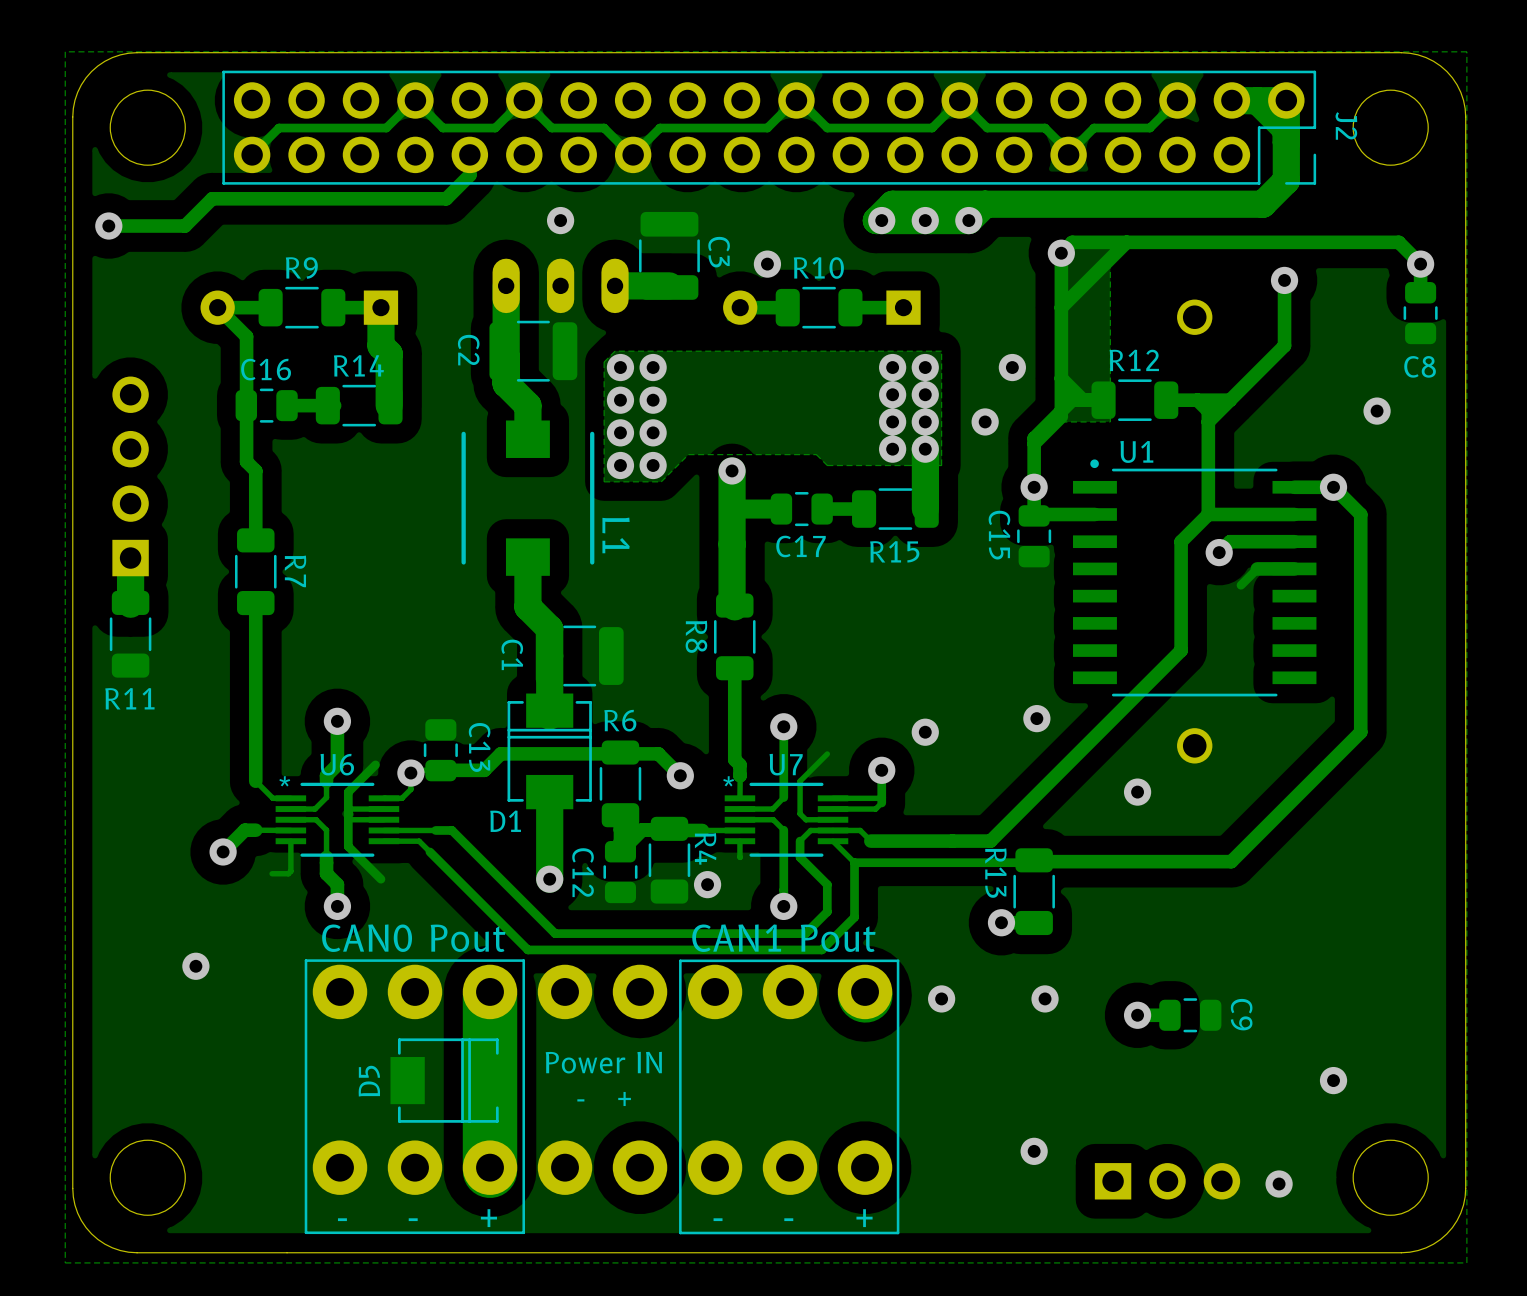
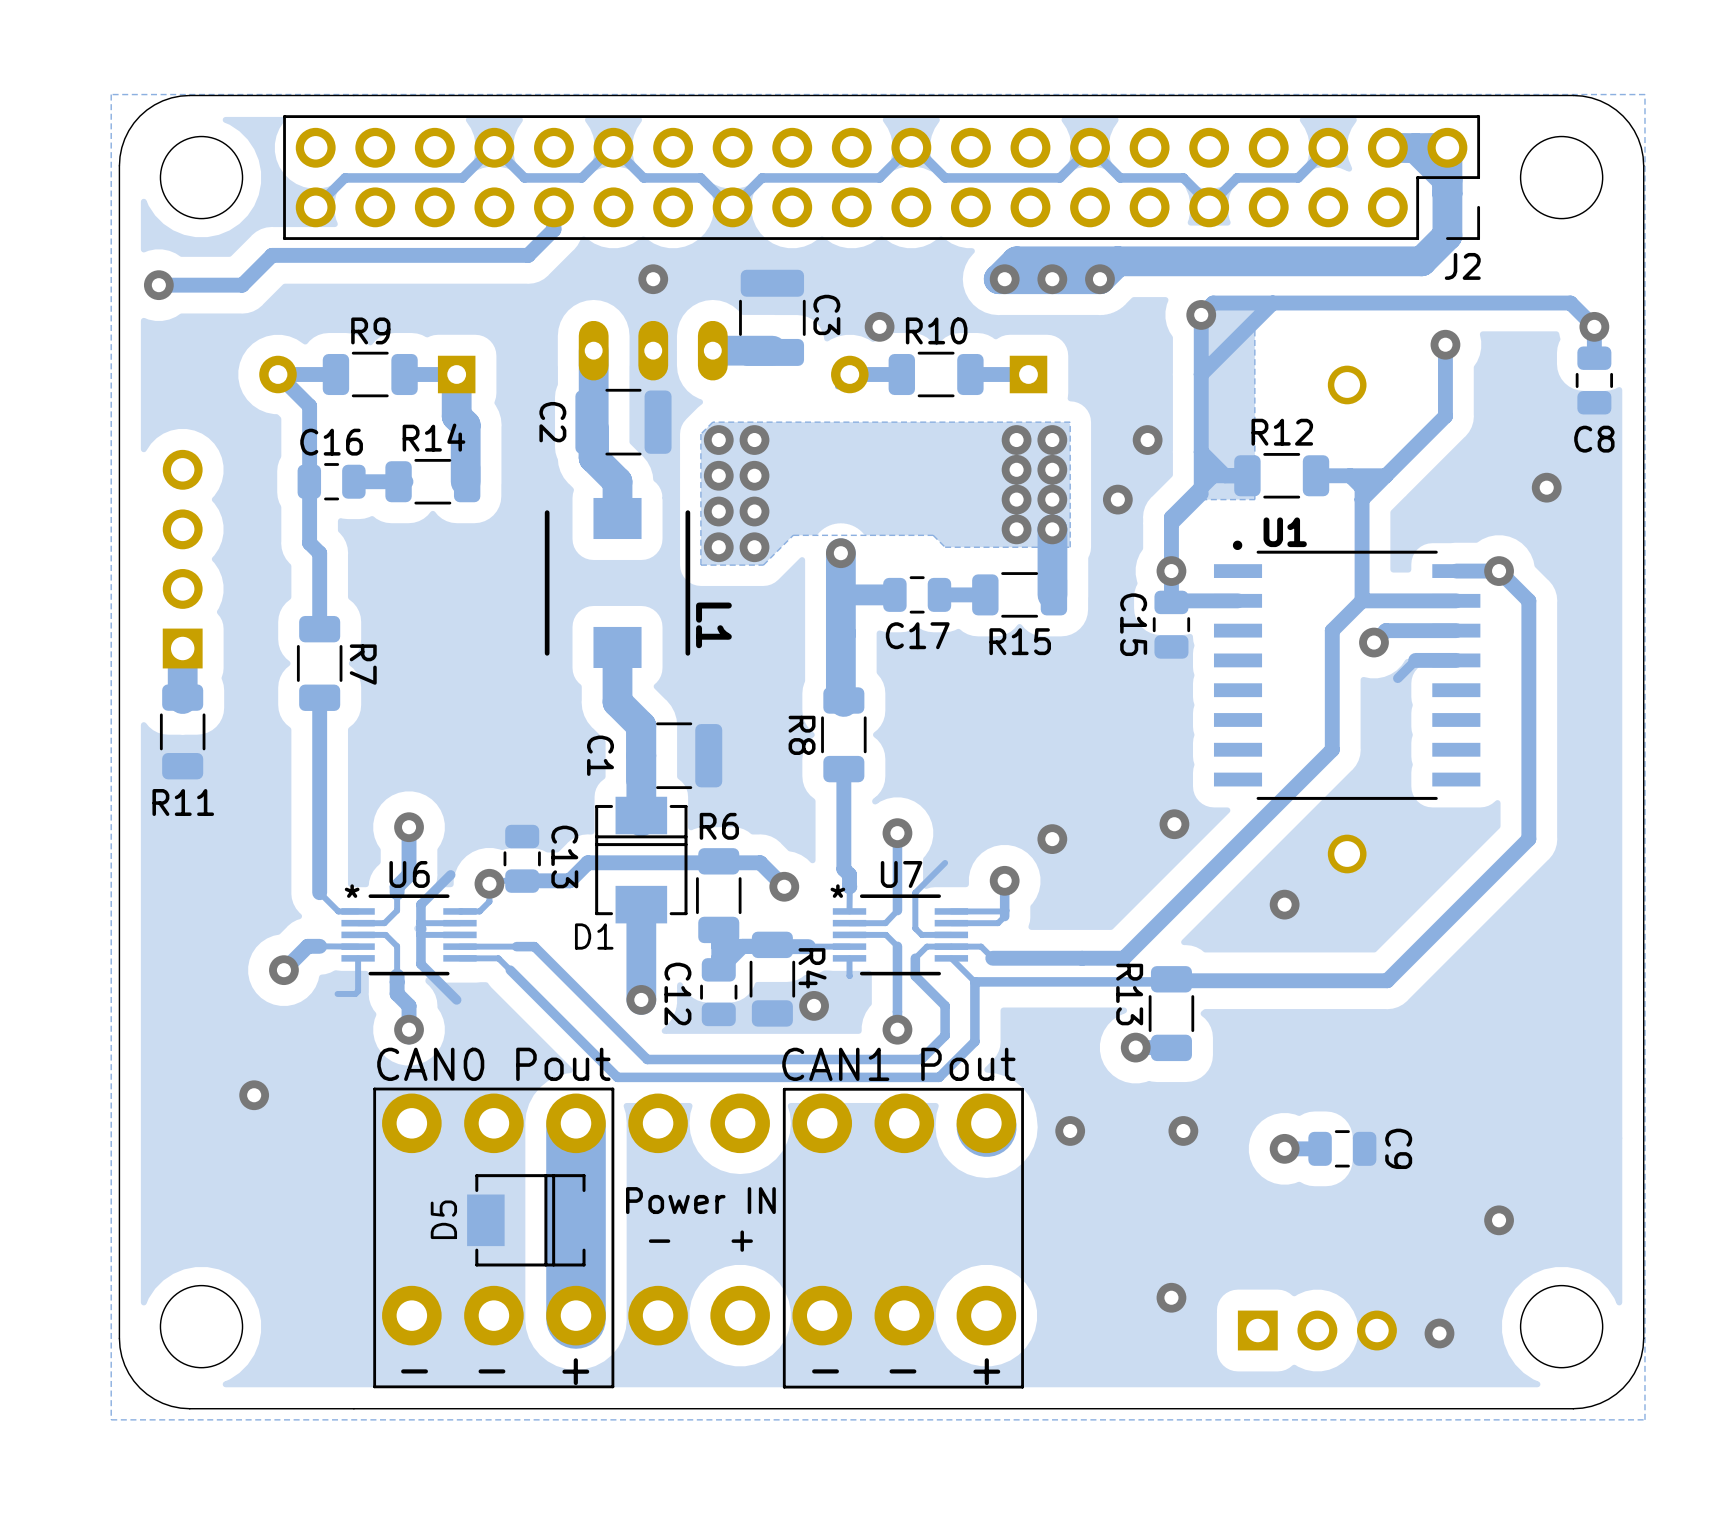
J2 name rotation: 0° (1346, 125) -> 90° counterclockwise (1462, 266)
J2 name position: J2 (1346, 125) -> J2 (1462, 266)

